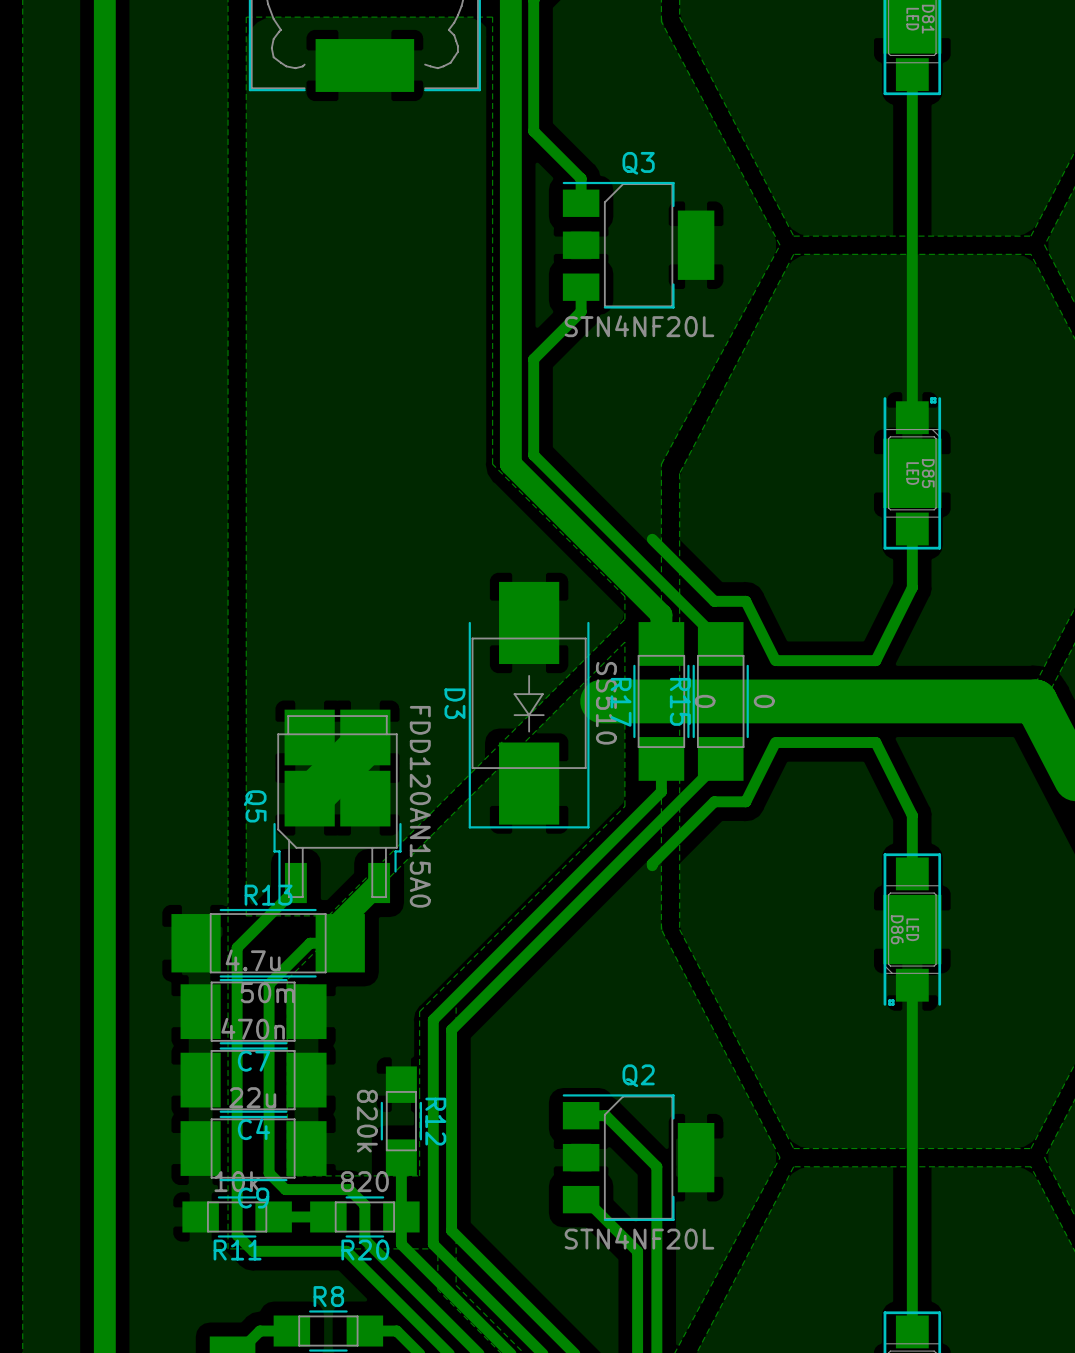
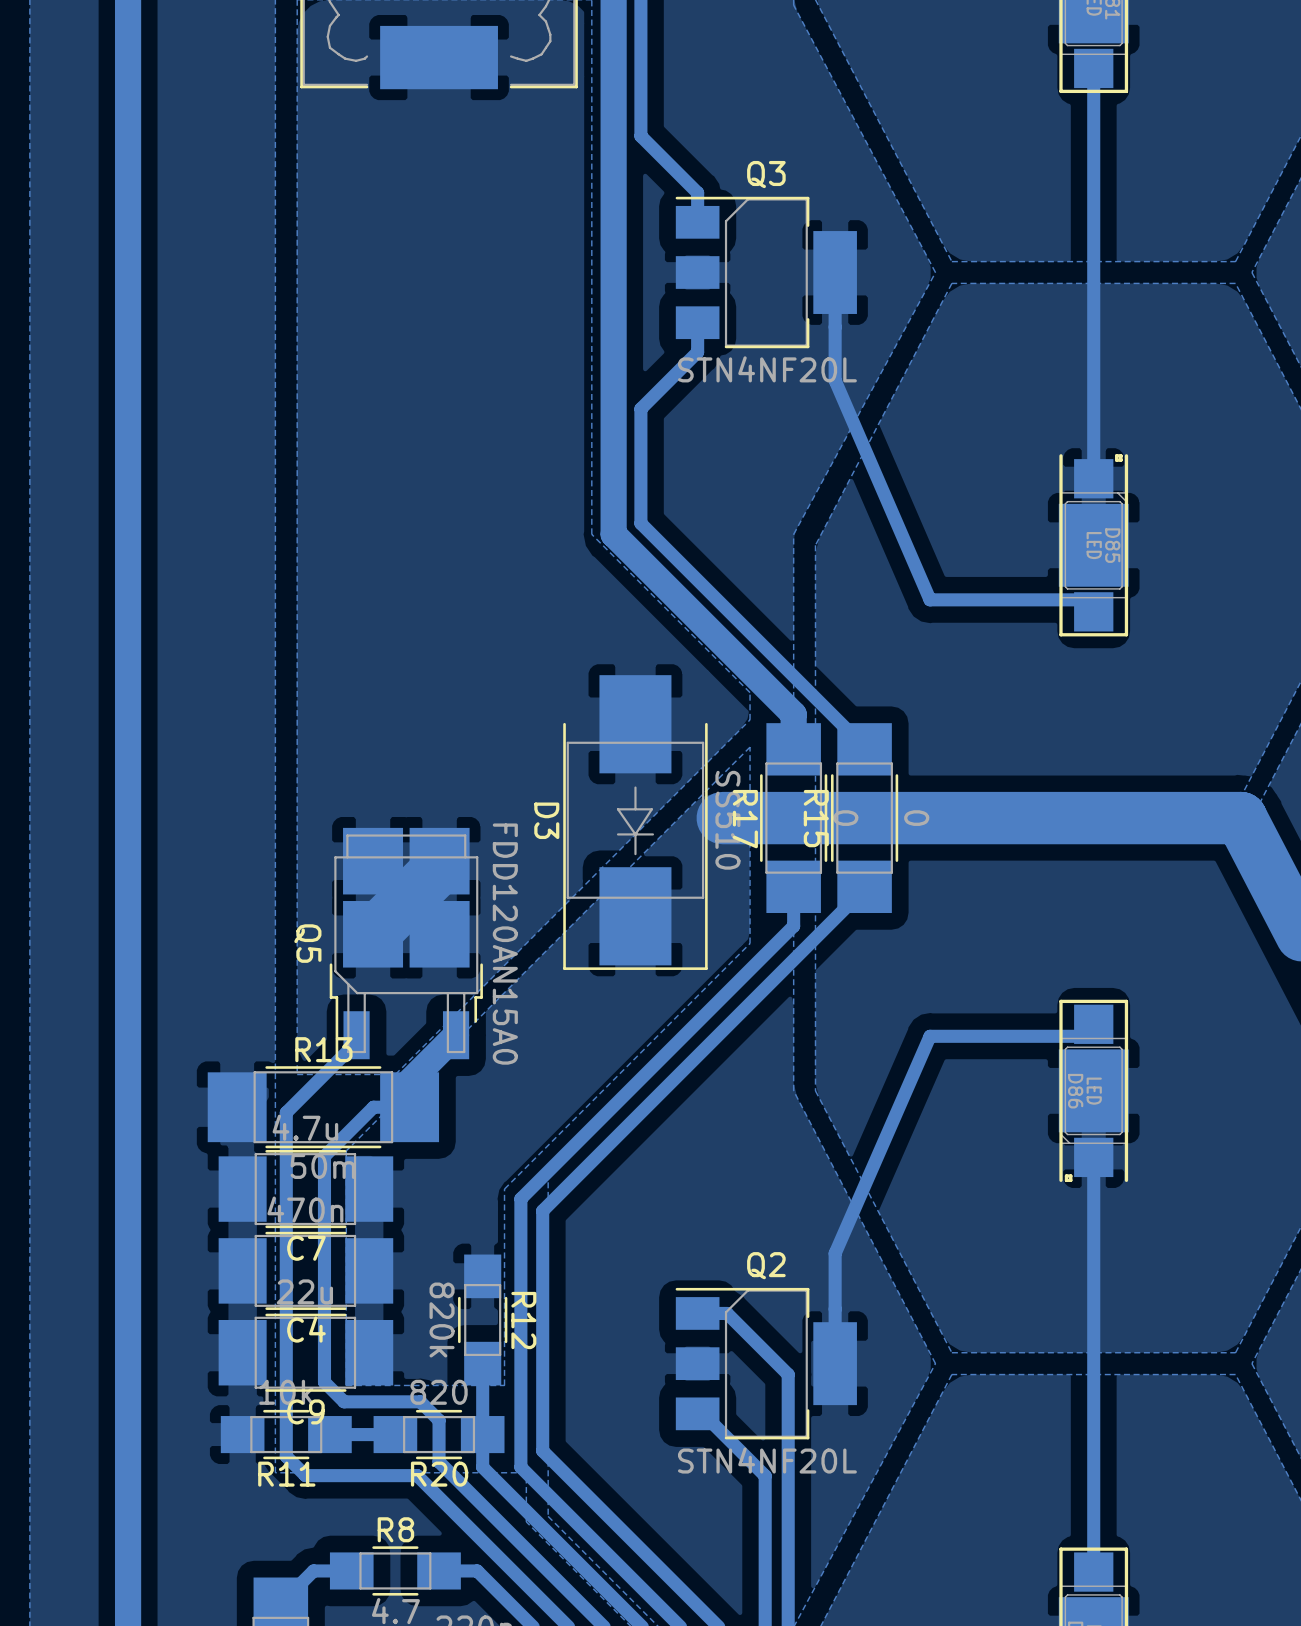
track: none -> (835, 272) (835, 380) (930, 599) (1093, 599)
track: (912, 529) (912, 587) (875, 660) (777, 660) -> none
track: (652, 539) (714, 601) (745, 601) (775, 660) -> none
track: (775, 742) (745, 801) (714, 801) (652, 865) -> none
track: (777, 742) (875, 742) (912, 815) (912, 873) -> none
track: none -> (1093, 1036) (930, 1036) (835, 1253) (835, 1363)

